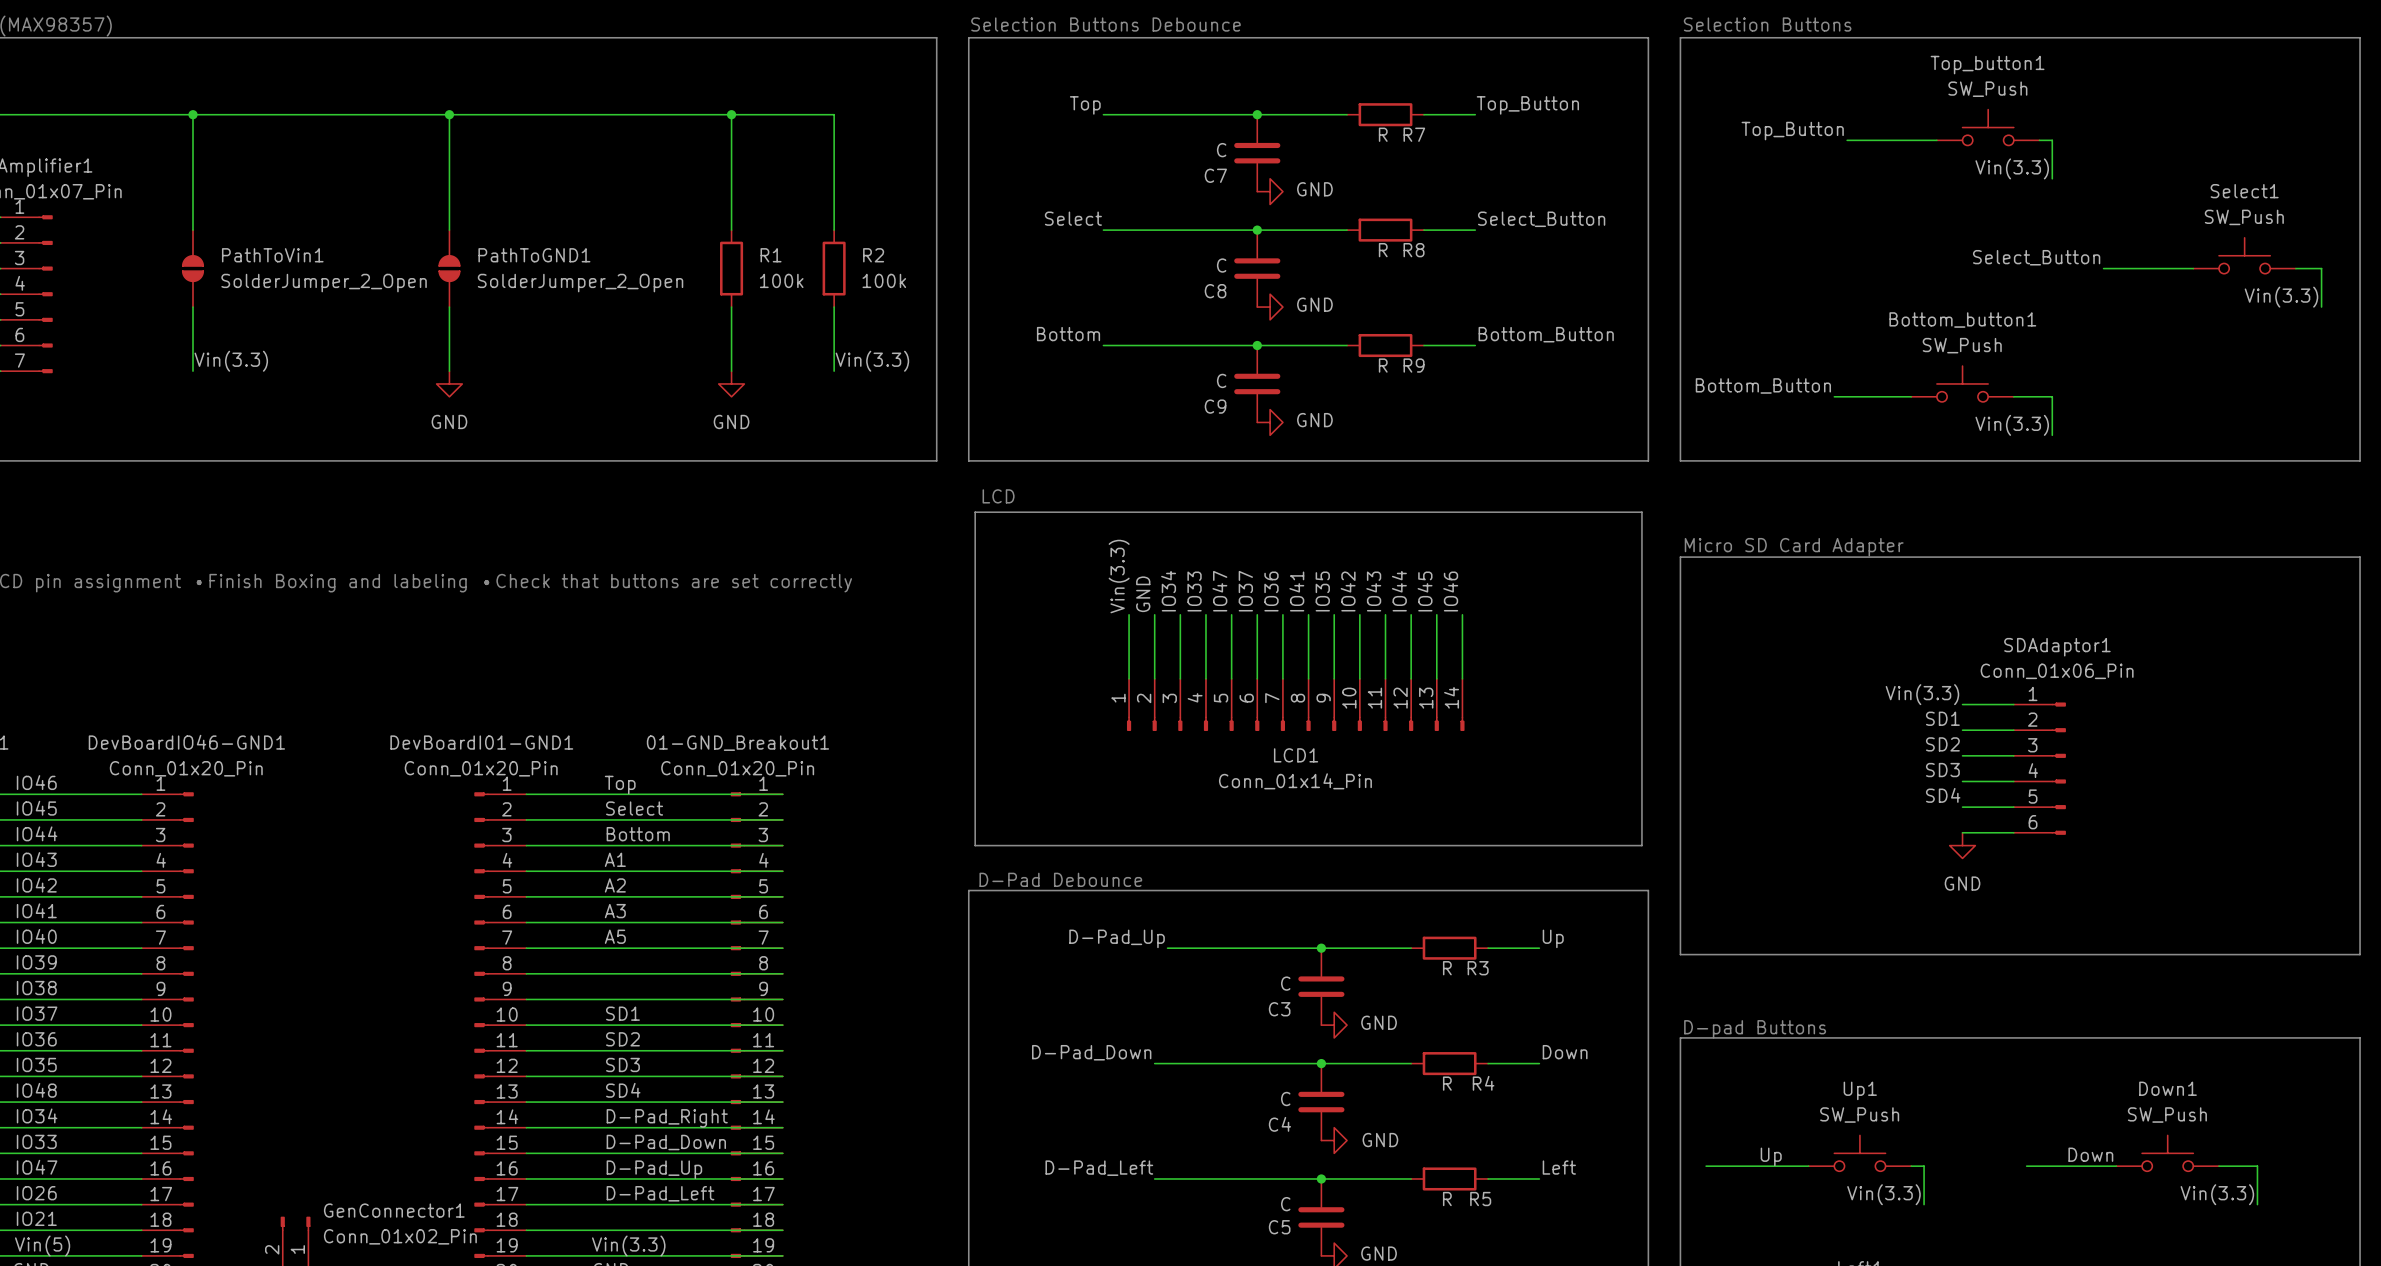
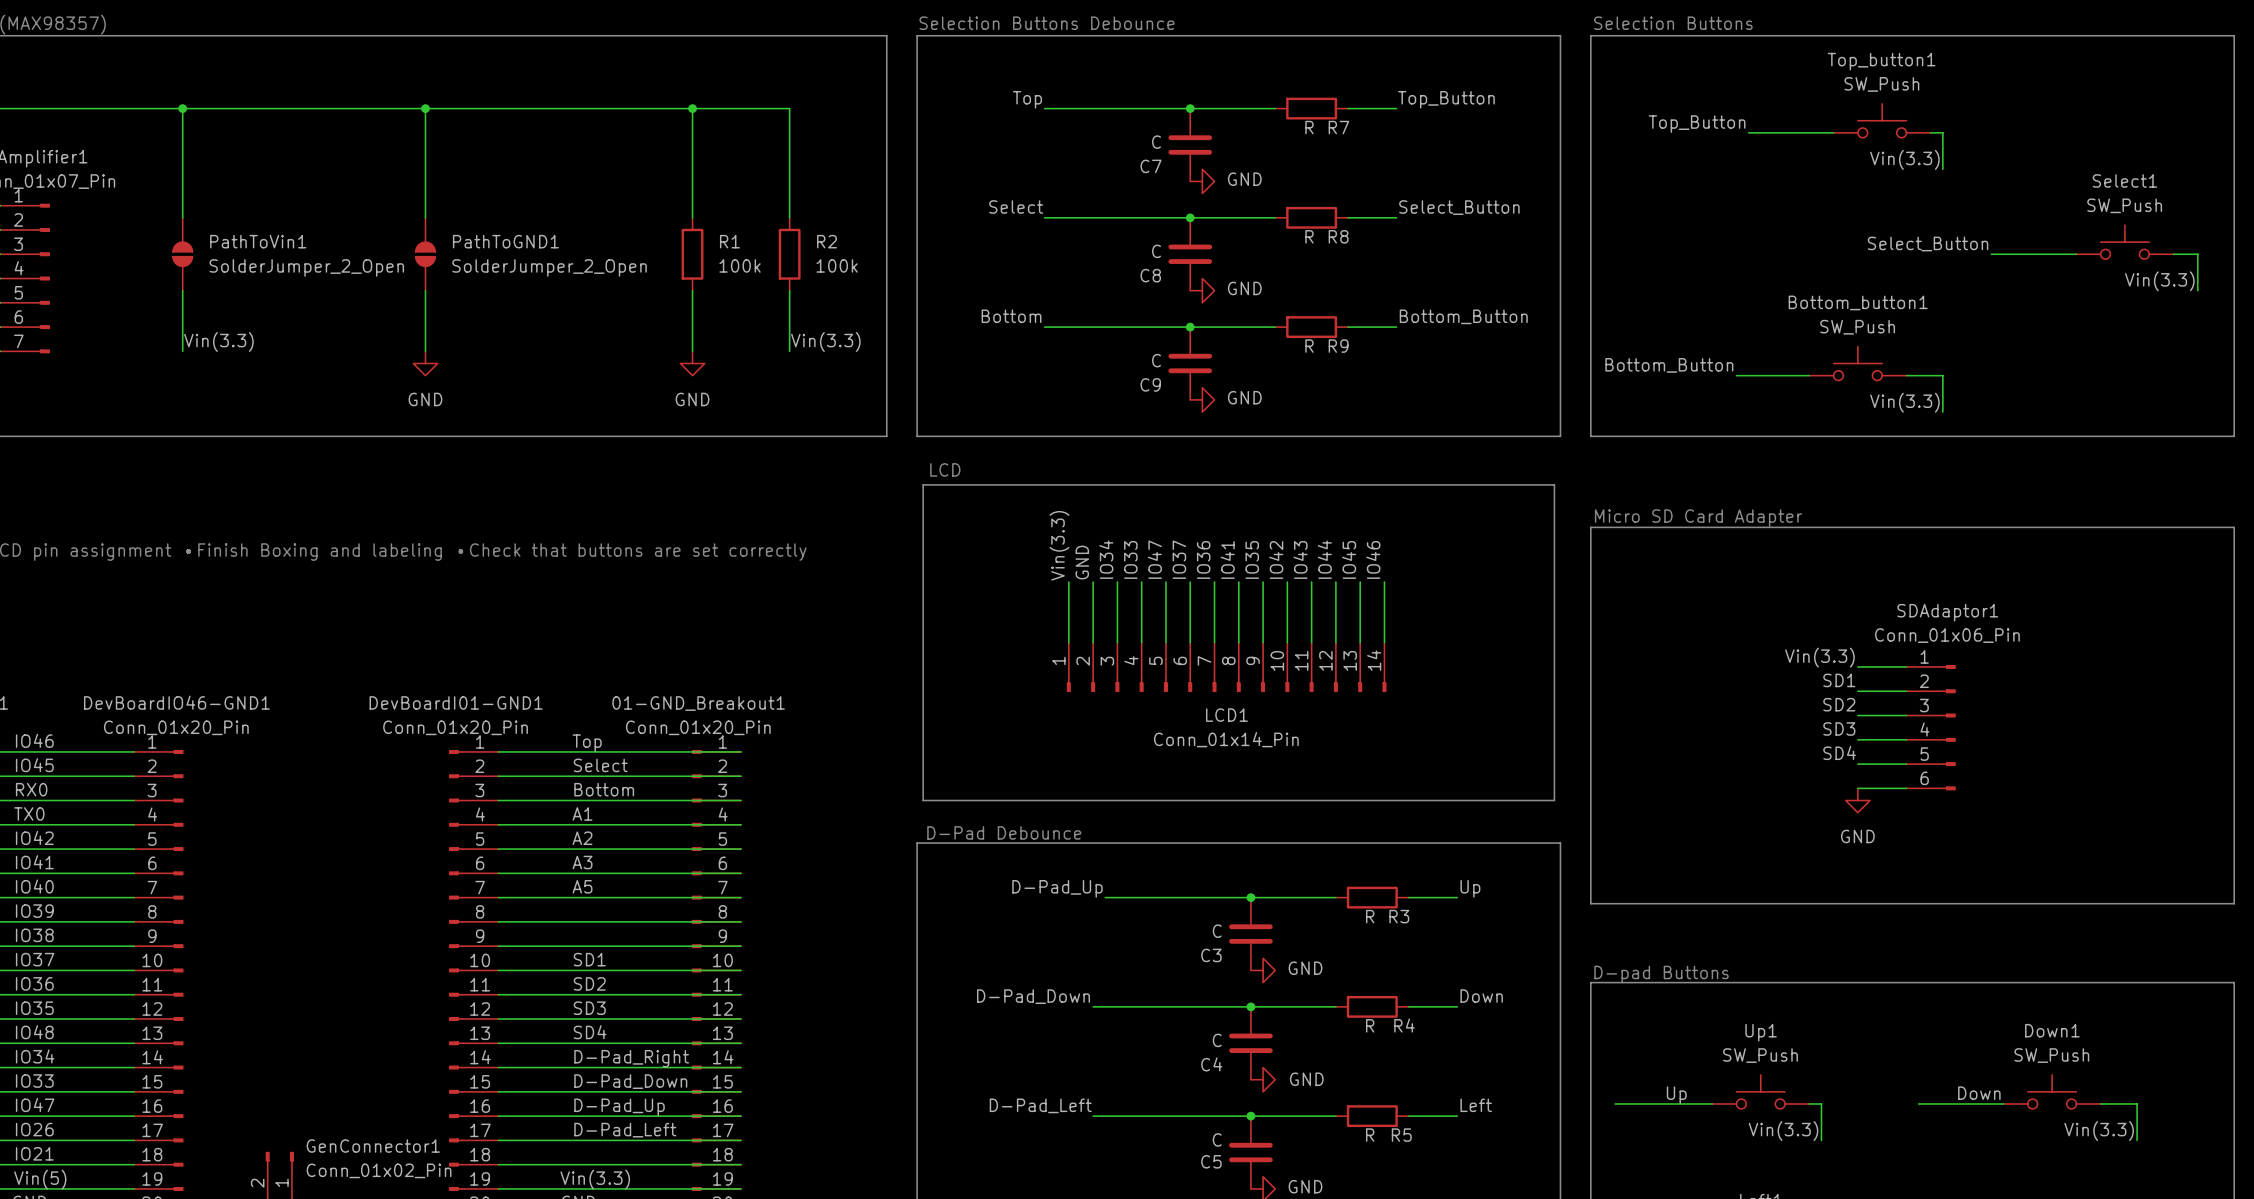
label: IO44 (37, 833) -> RX0 (31, 789)
label: IO43 (36, 859) -> TX0 (29, 813)

